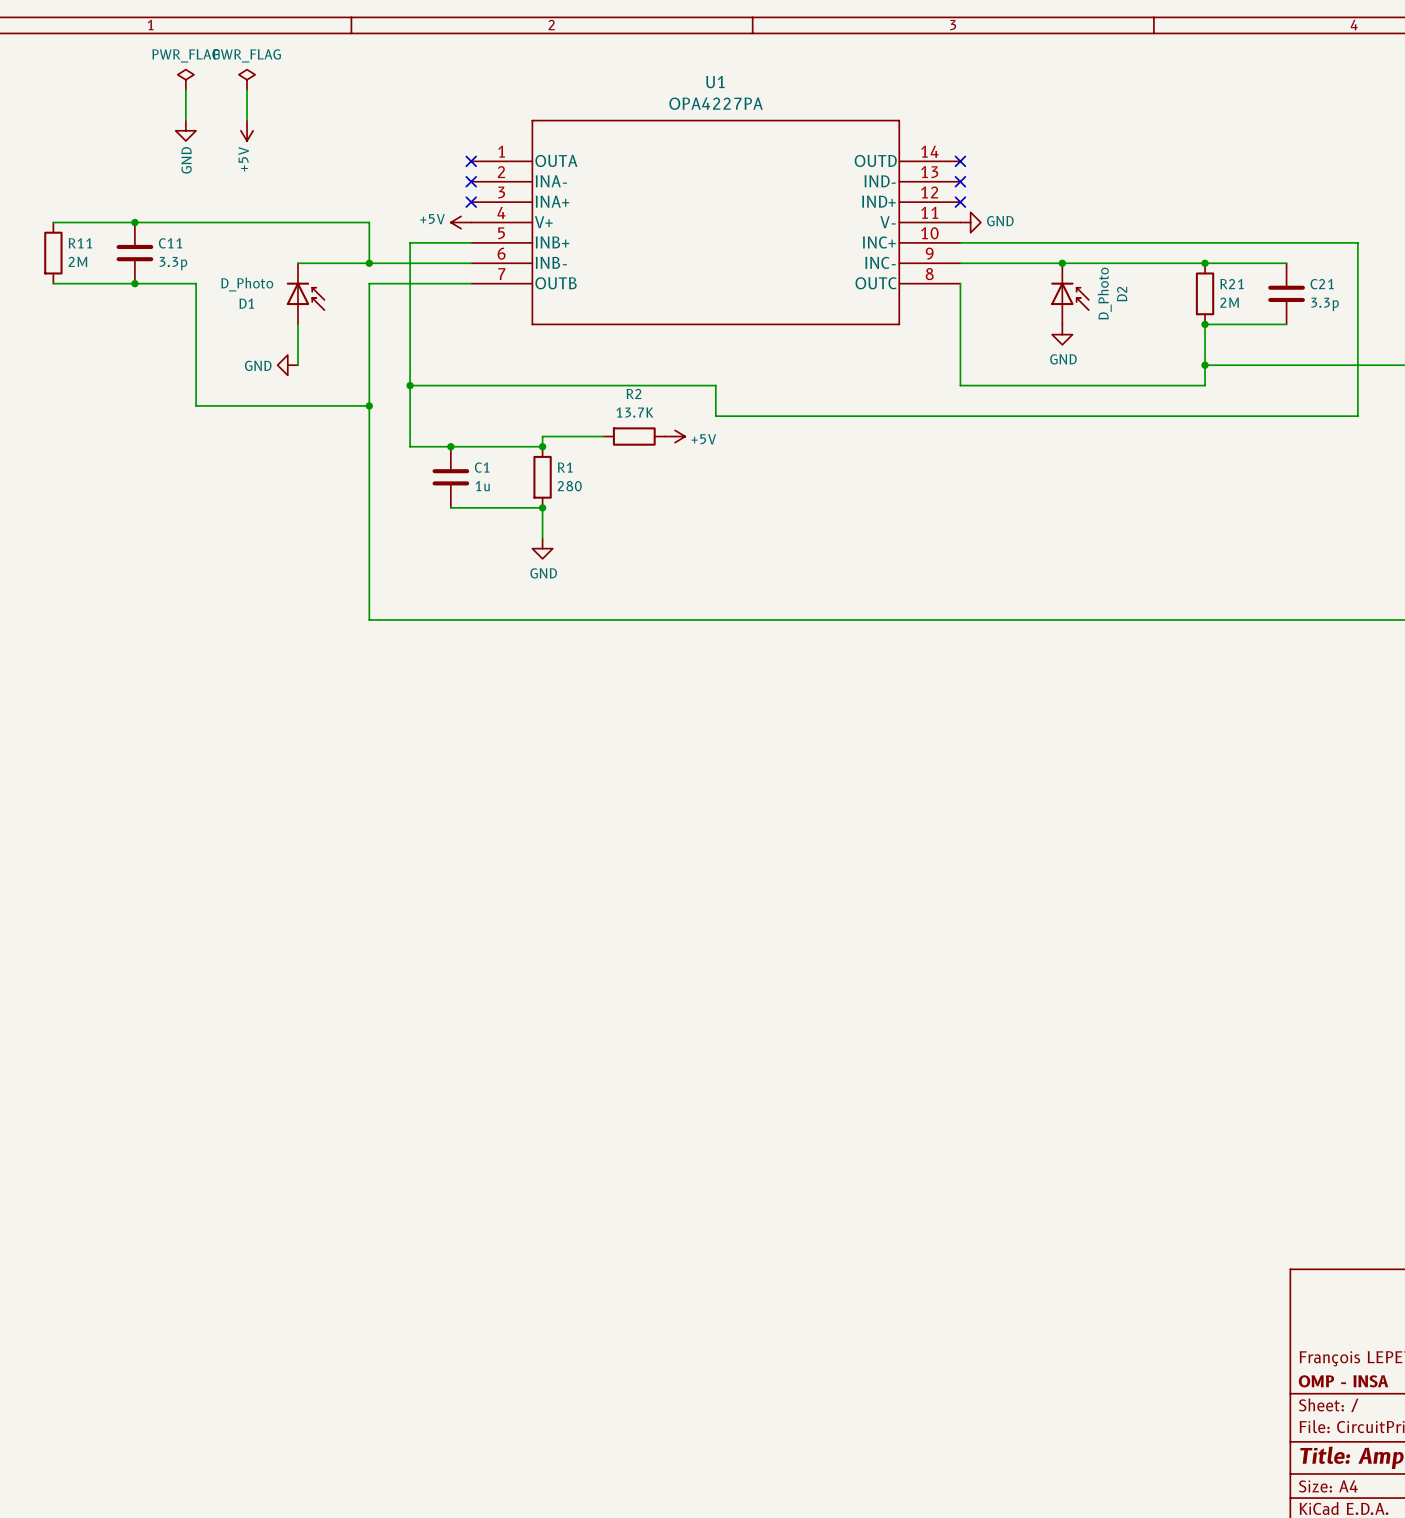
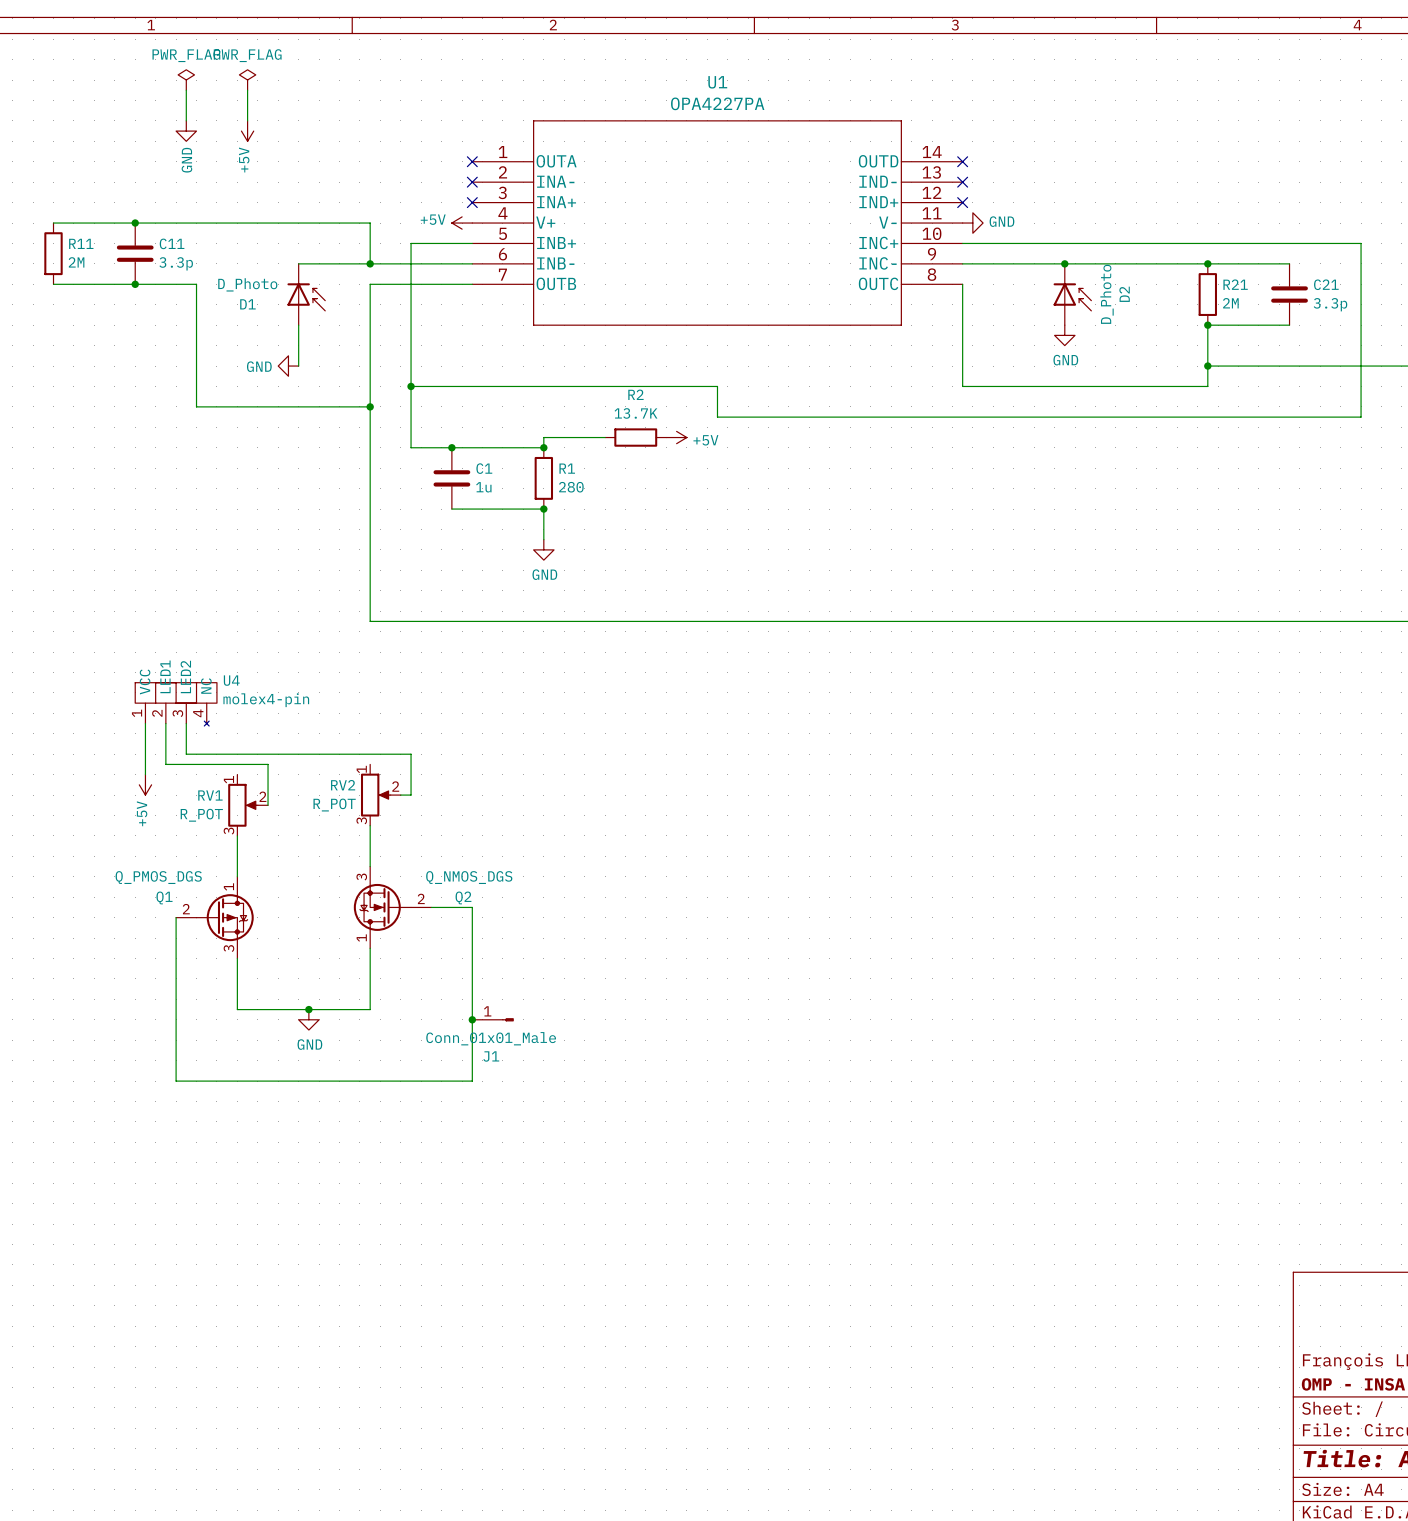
U4: none -> molex4-pin (176, 704)
wire: none -> (145, 723) (145, 774)
wire: none -> (165, 723) (165, 764) (268, 764) (268, 805)
wire: none -> (186, 723) (186, 754) (411, 754) (411, 795) (400, 795)
power symbol: none -> +5V (145, 784)
RV2: none -> R_POT (380, 795)
RV1: none -> R_POT (248, 805)
wire: none -> (370, 825) (370, 866)
wire: none -> (237, 835) (237, 876)
Q2: none -> Q_NMOS_DGS (392, 907)
wire: none -> (431, 907) (472, 907) (472, 1081) (176, 1081) (176, 917)
Q1: none -> Q_PMOS_DGS (214, 917)
wire: none -> (370, 948) (370, 1009) (237, 1009) (237, 958)
junction: none -> (308, 1009)
power symbol: none -> GND (308, 1019)
junction: none -> (472, 1019)
J1: none -> Conn_01x01_Male (493, 1019)

